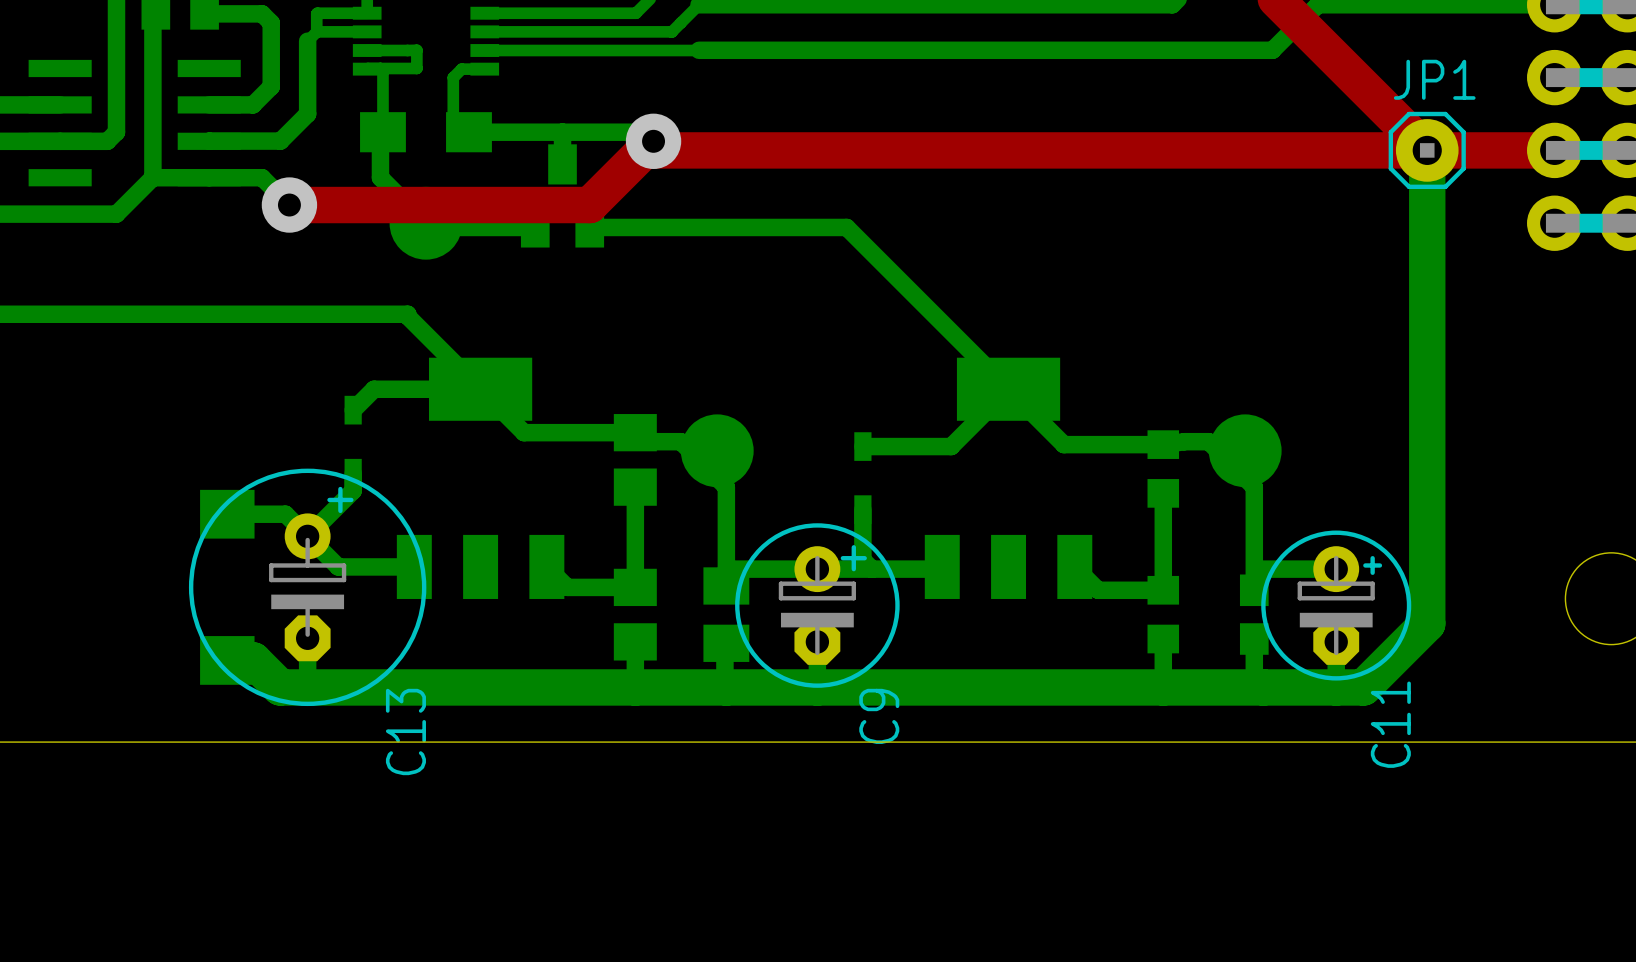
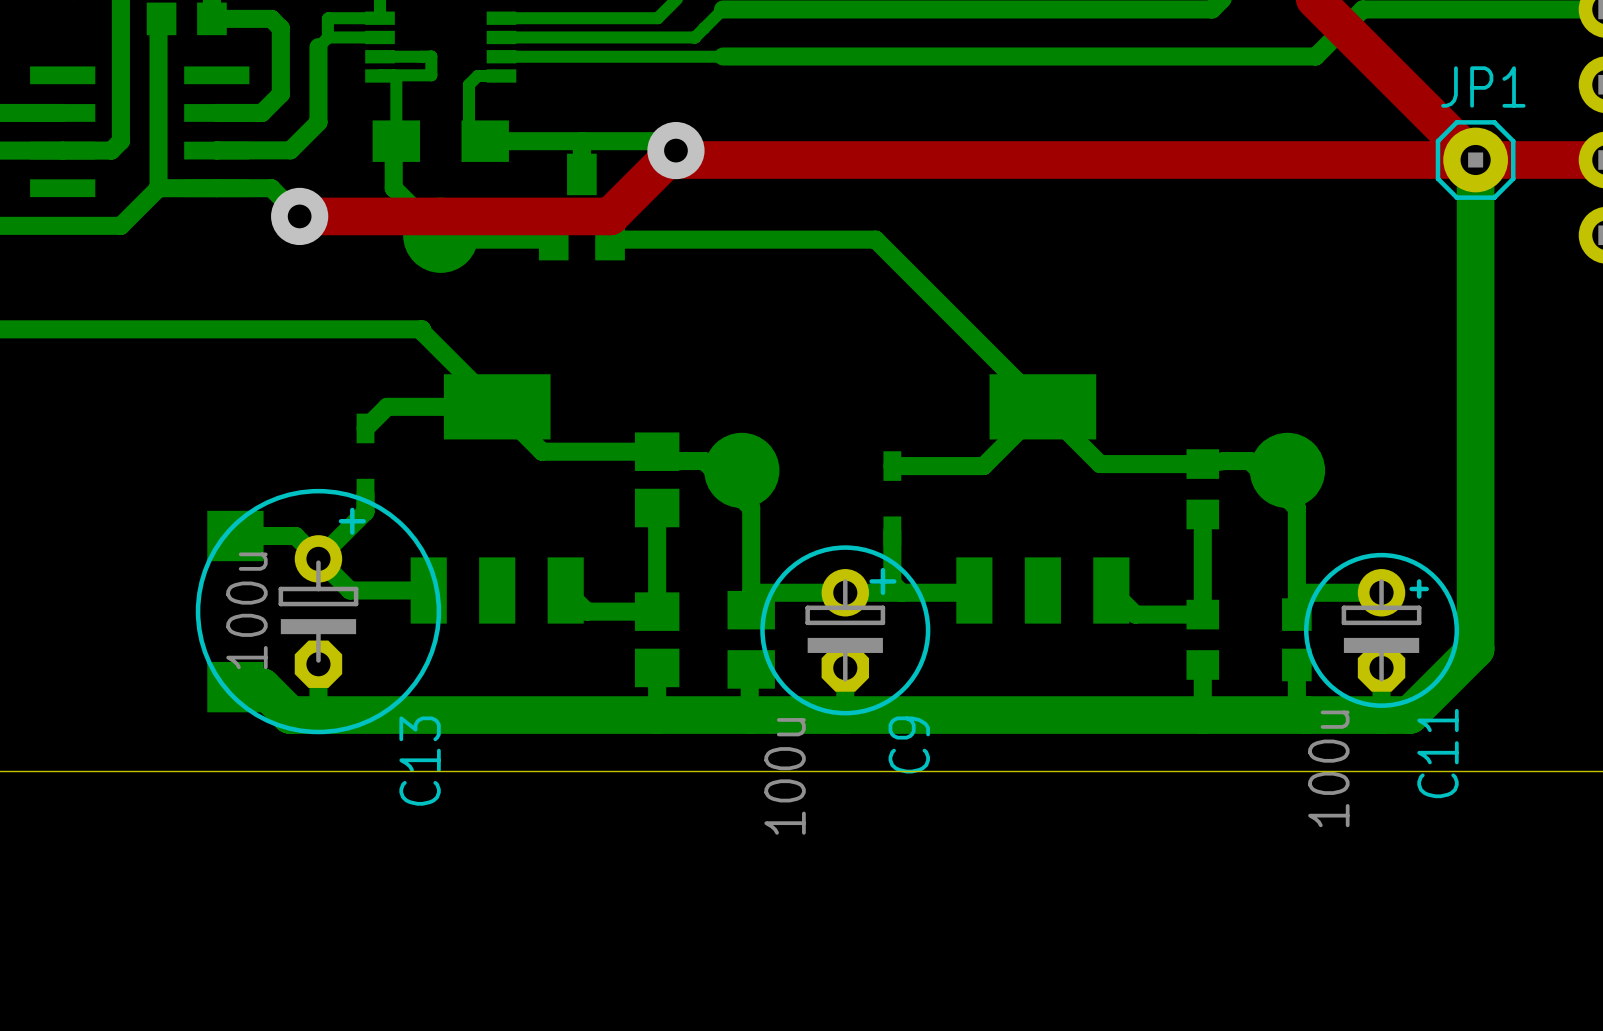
C13 value: none -> 100u (246, 610)
C11 value: none -> 100u (1328, 768)
C9 value: none -> 100u (785, 776)

